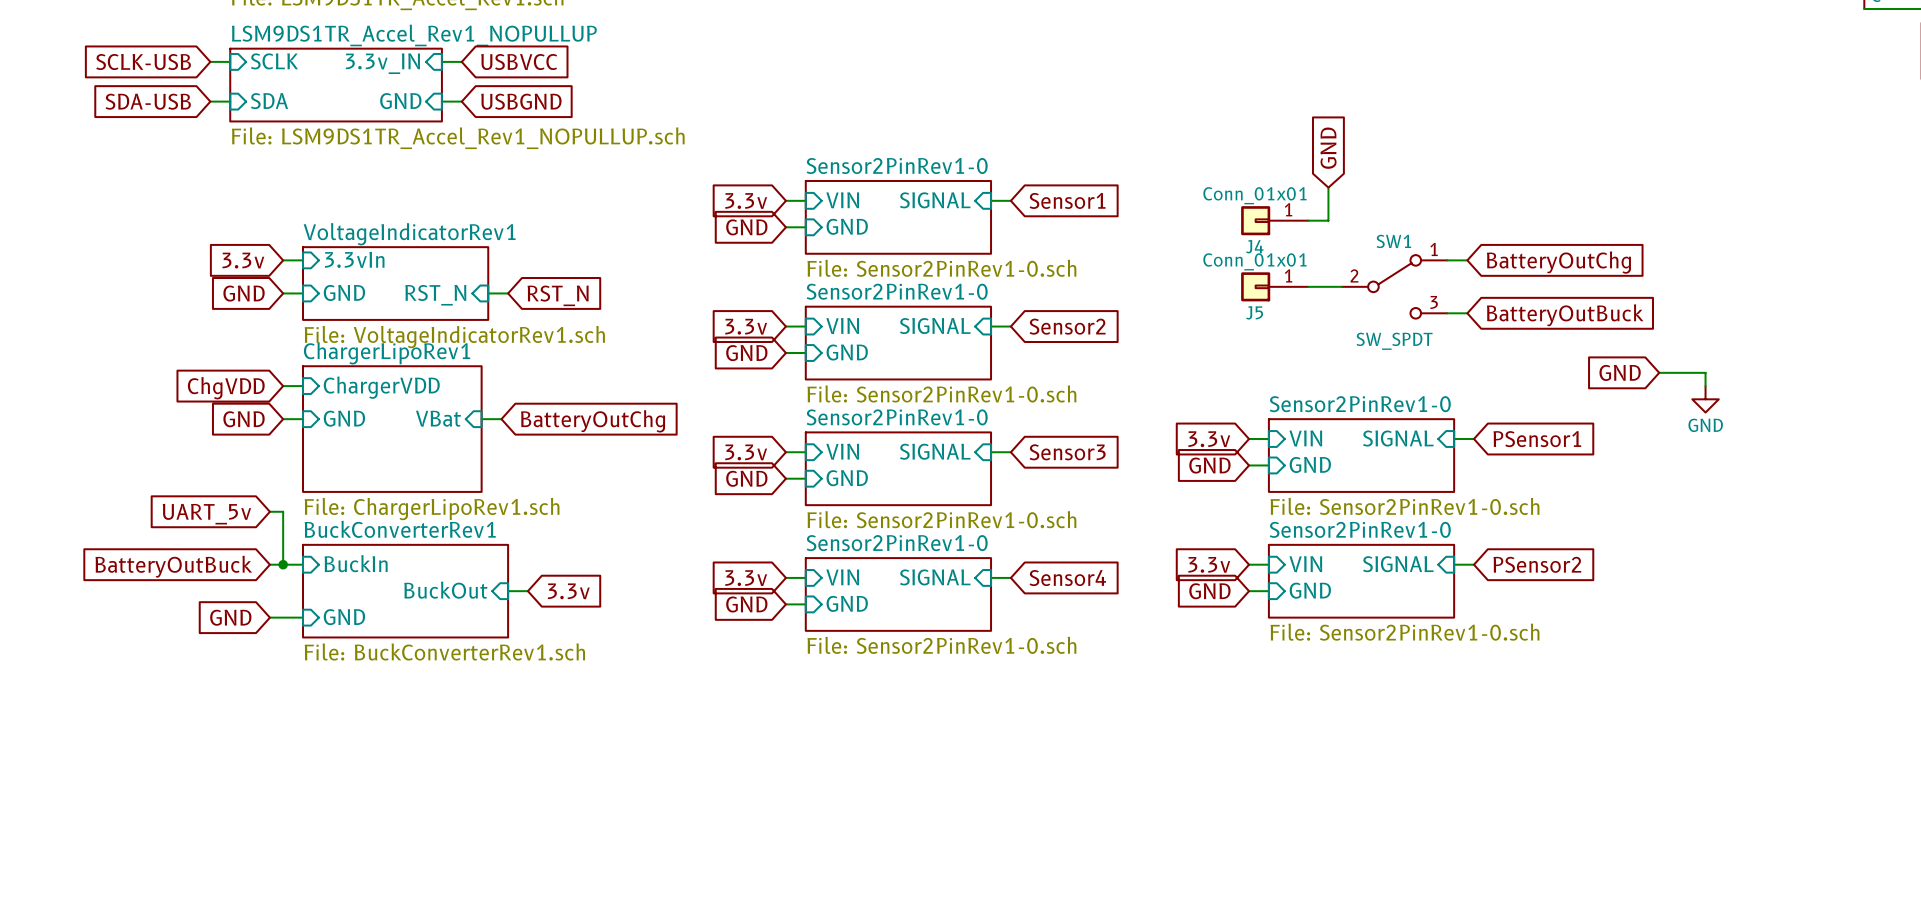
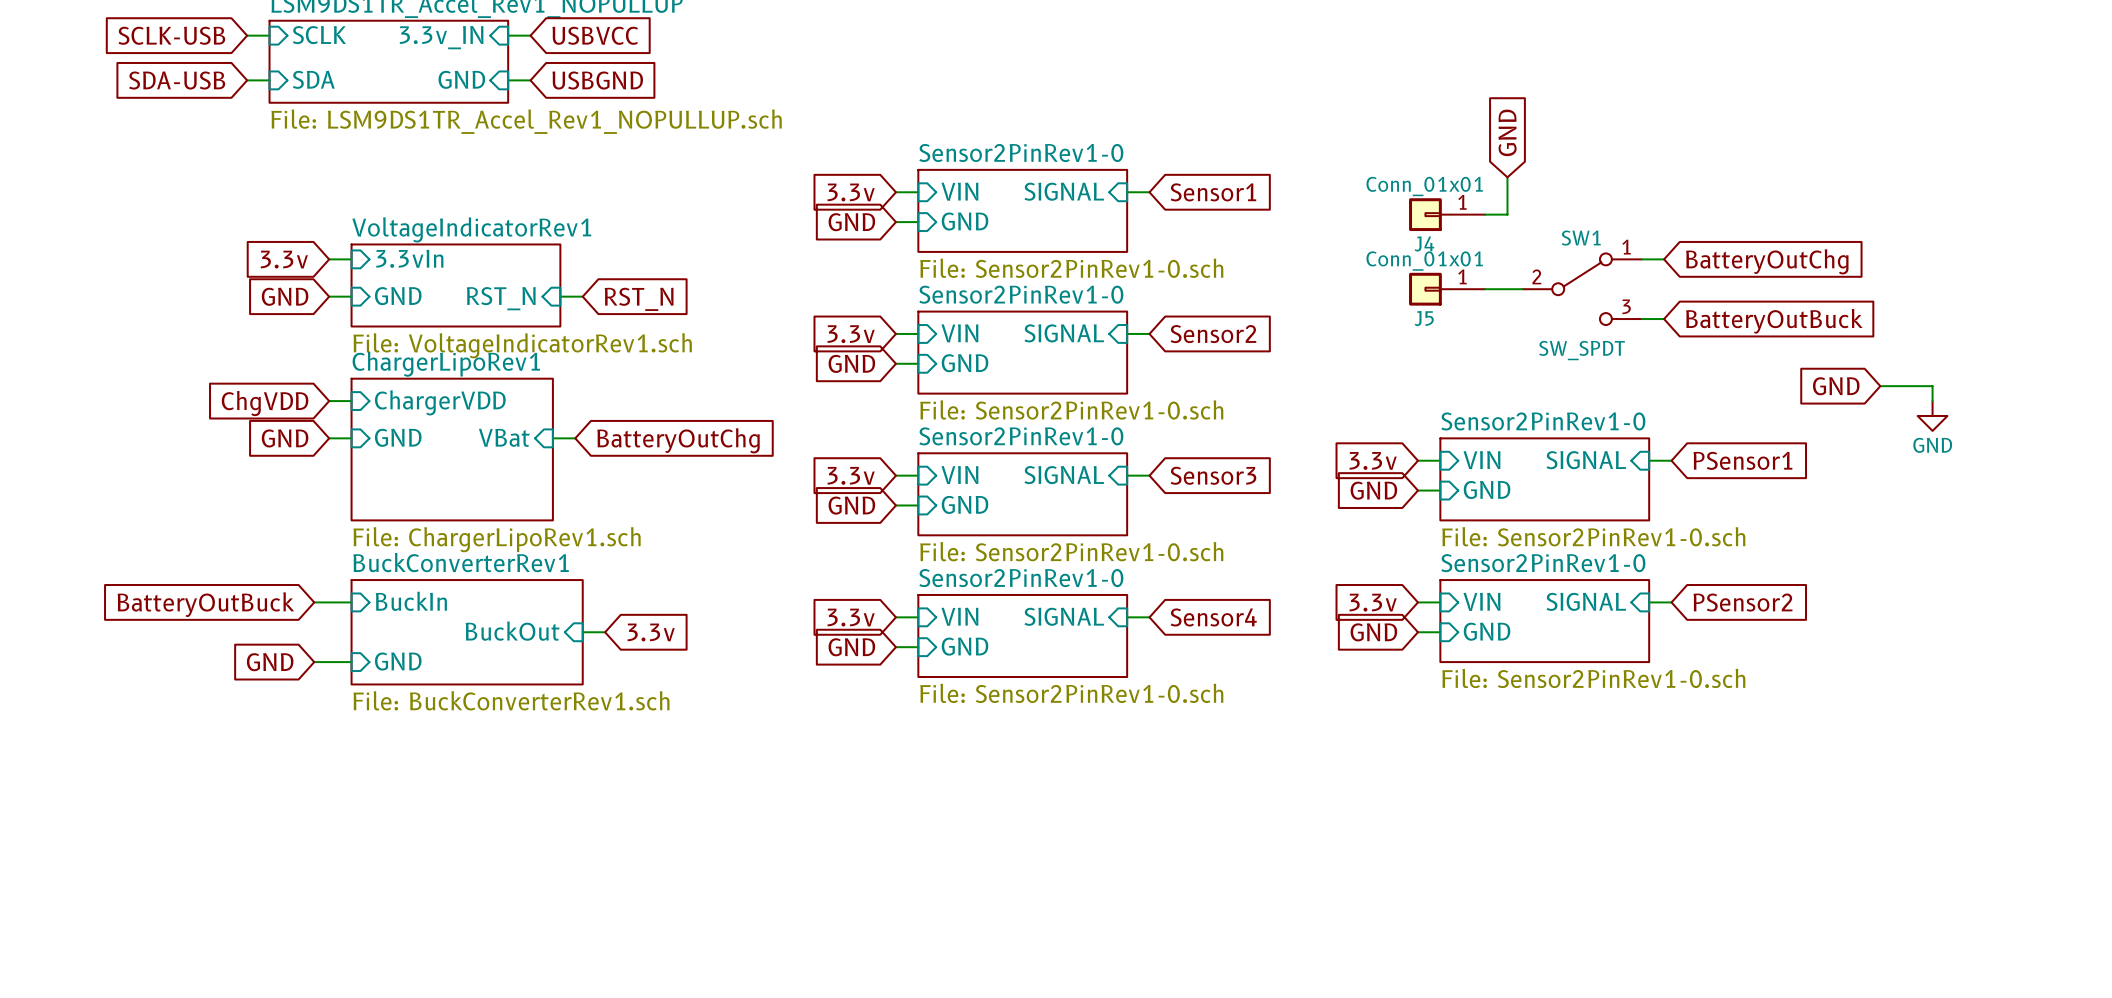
wire: (269, 511) (283, 511) (283, 564) -> none
global label: UART_5v (206, 514) -> none
junction: (283, 564) -> none

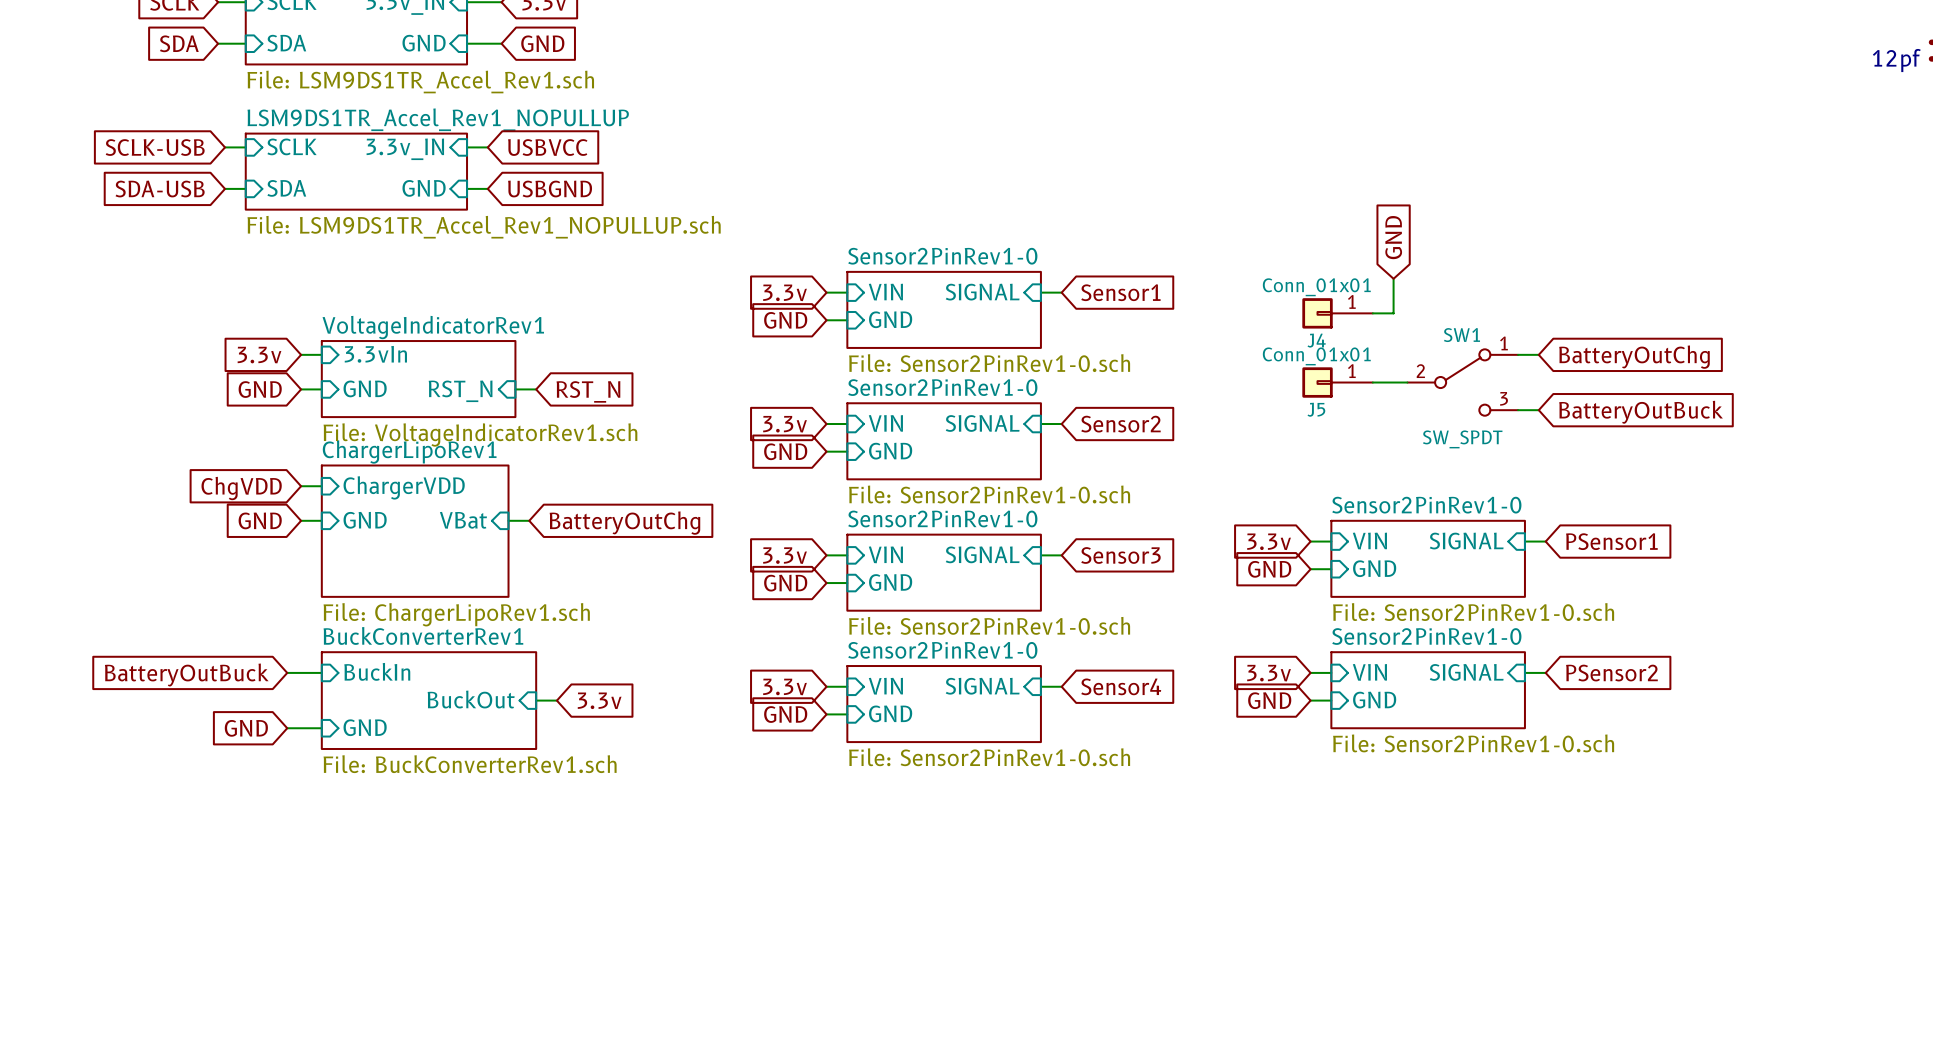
global label: GND (1836, 386) -> none
wire: (1880, 386) (1932, 386) (1932, 401) -> none
power symbol: GND (1932, 415) -> none

